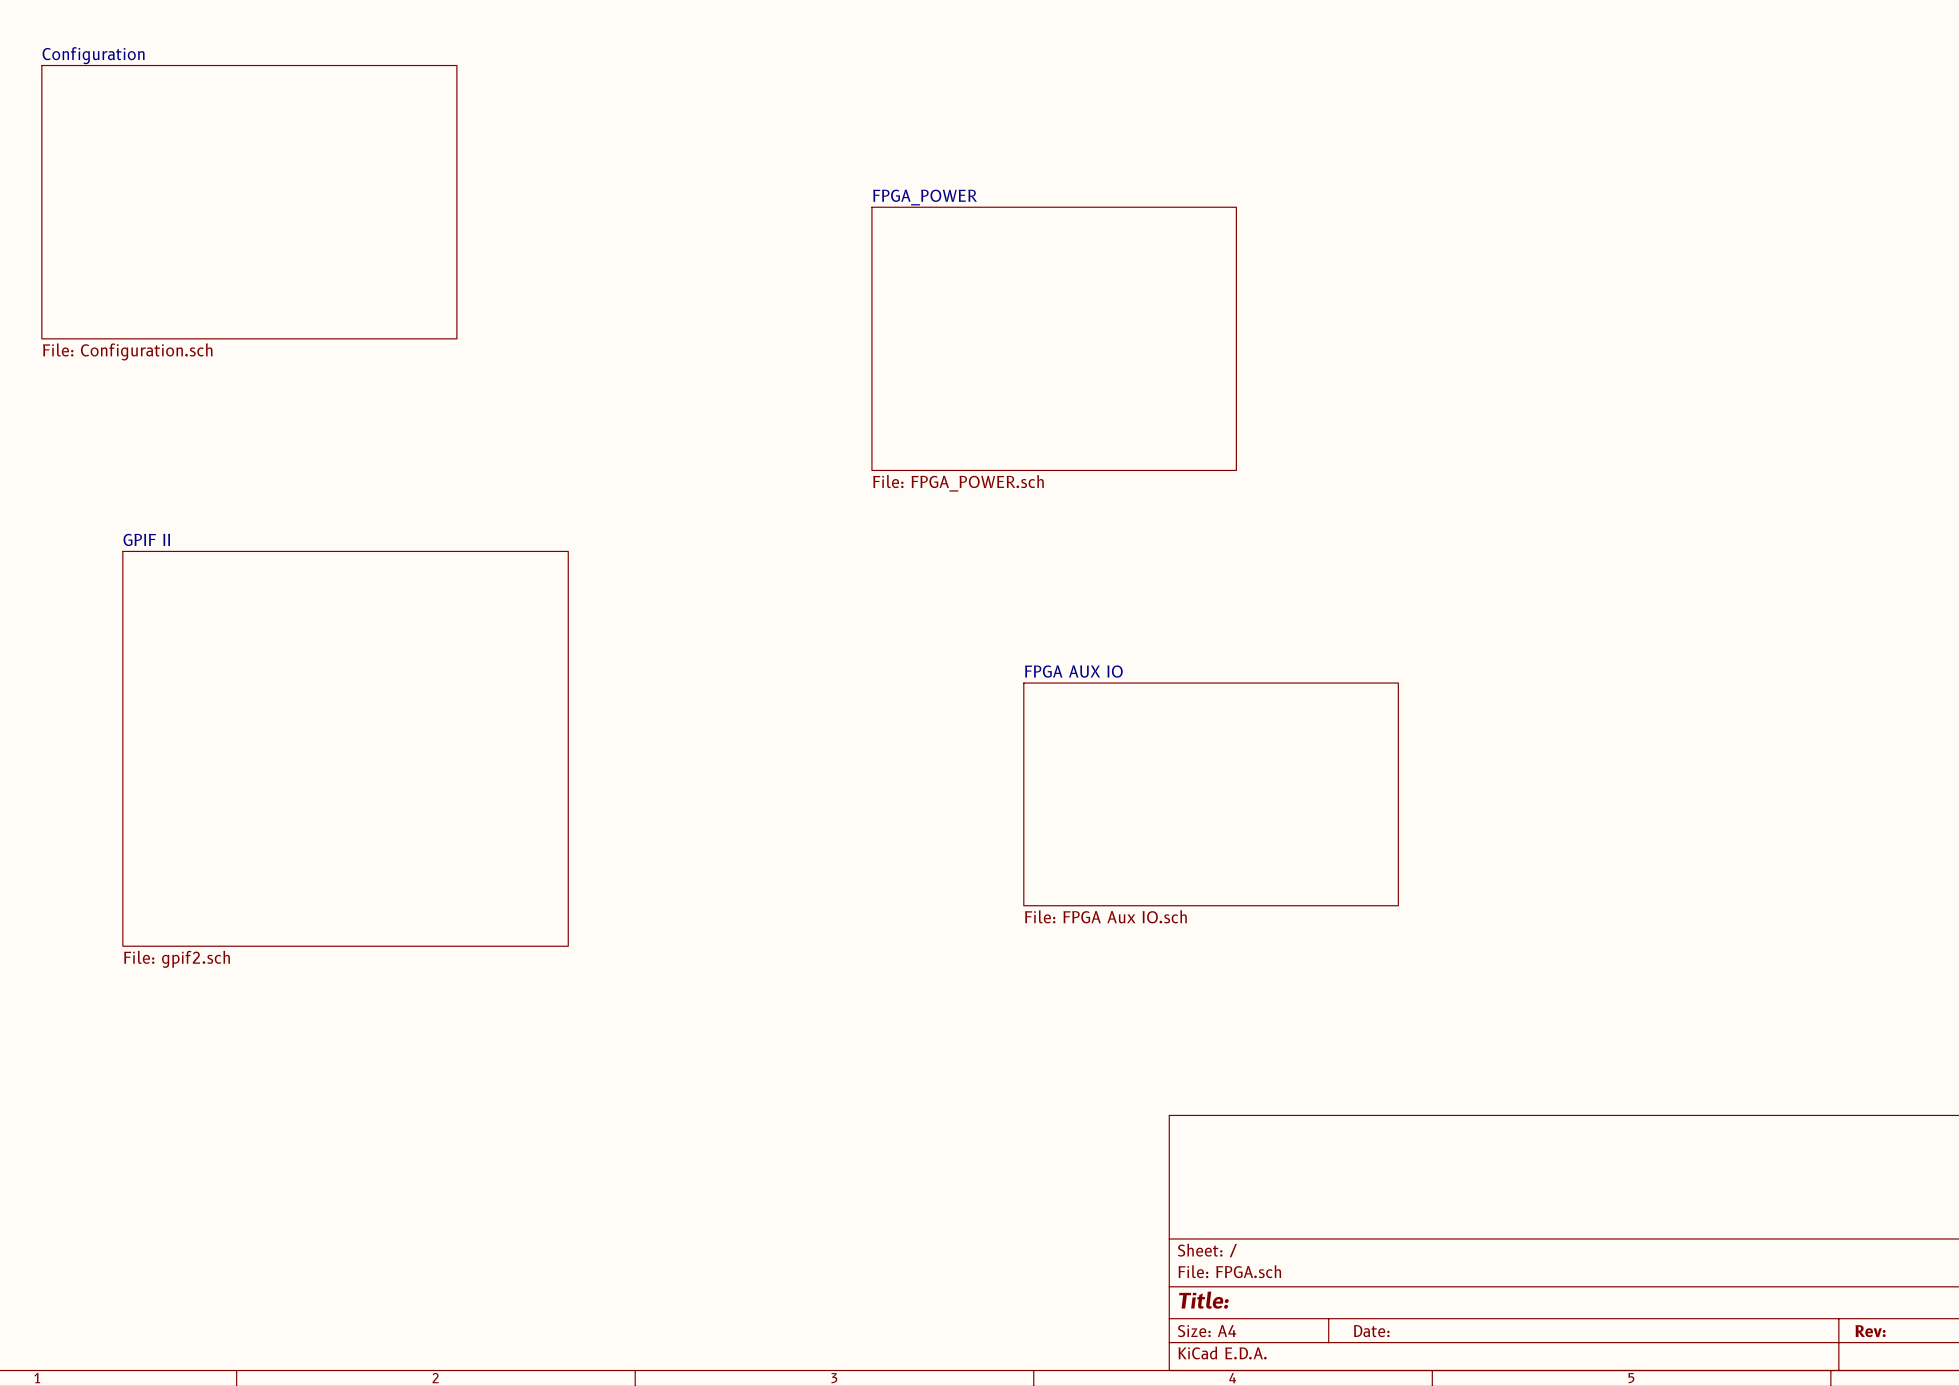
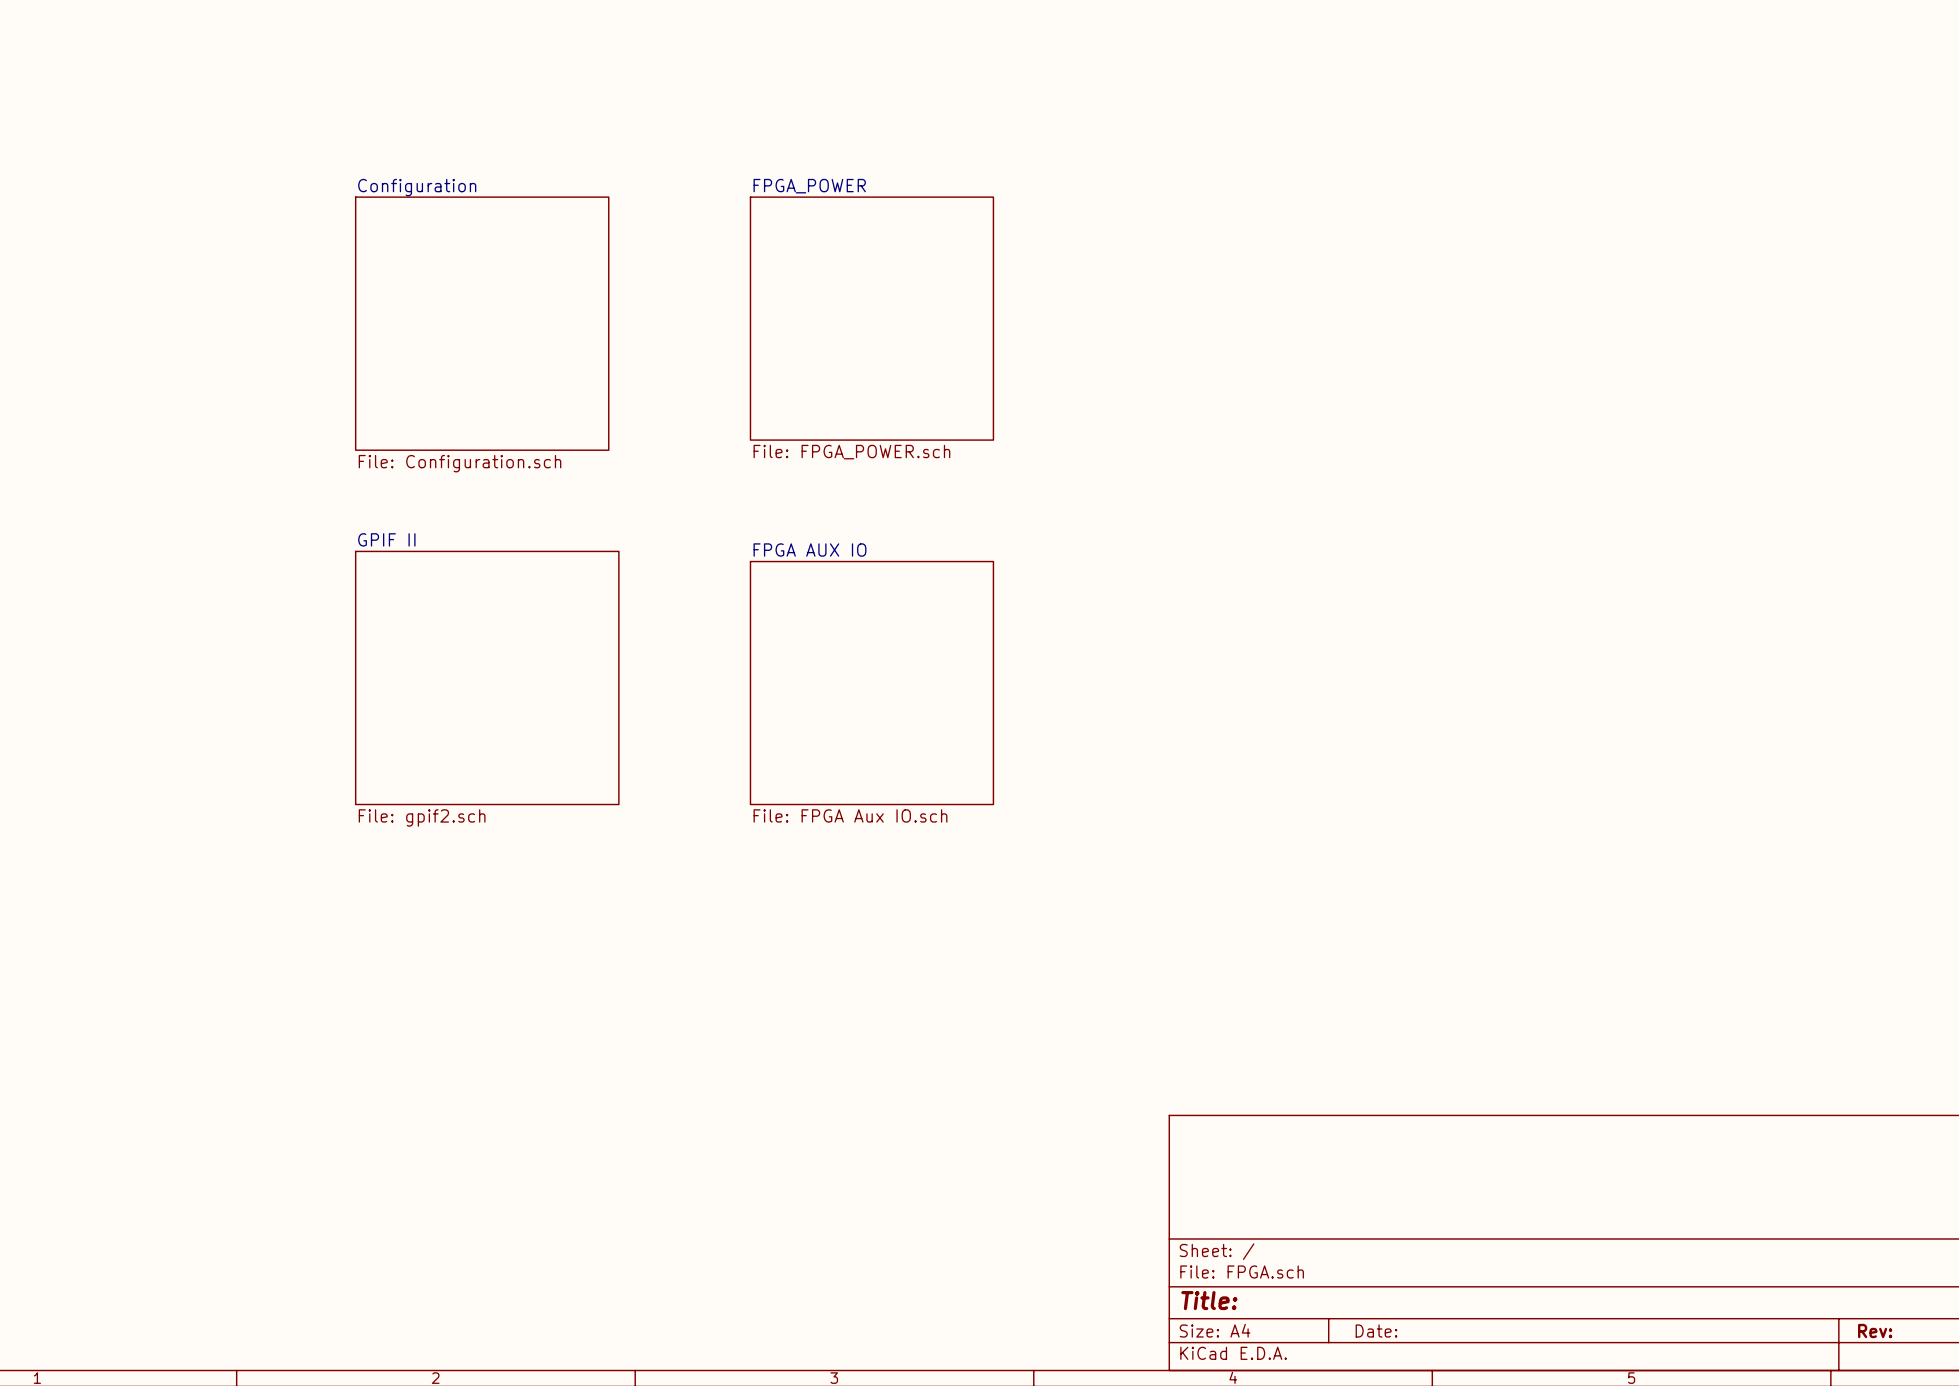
sheet Configuration: File: Configuration.sch (249, 202) -> none
sheet FPGA_POWER: none -> File: FPGA_POWER.sch (871, 318)
sheet Configuration: none -> File: Configuration.sch (482, 323)
sheet FPGA_POWER: File: FPGA_POWER.sch (1054, 338) -> none
sheet GPIF II: none -> File: gpif2.sch (487, 677)
sheet FPGA AUX IO: none -> File: FPGA Aux IO.sch (871, 683)
sheet GPIF II: File: gpif2.sch (345, 748) -> none
sheet FPGA AUX IO: File: FPGA Aux IO.sch (1211, 794) -> none

